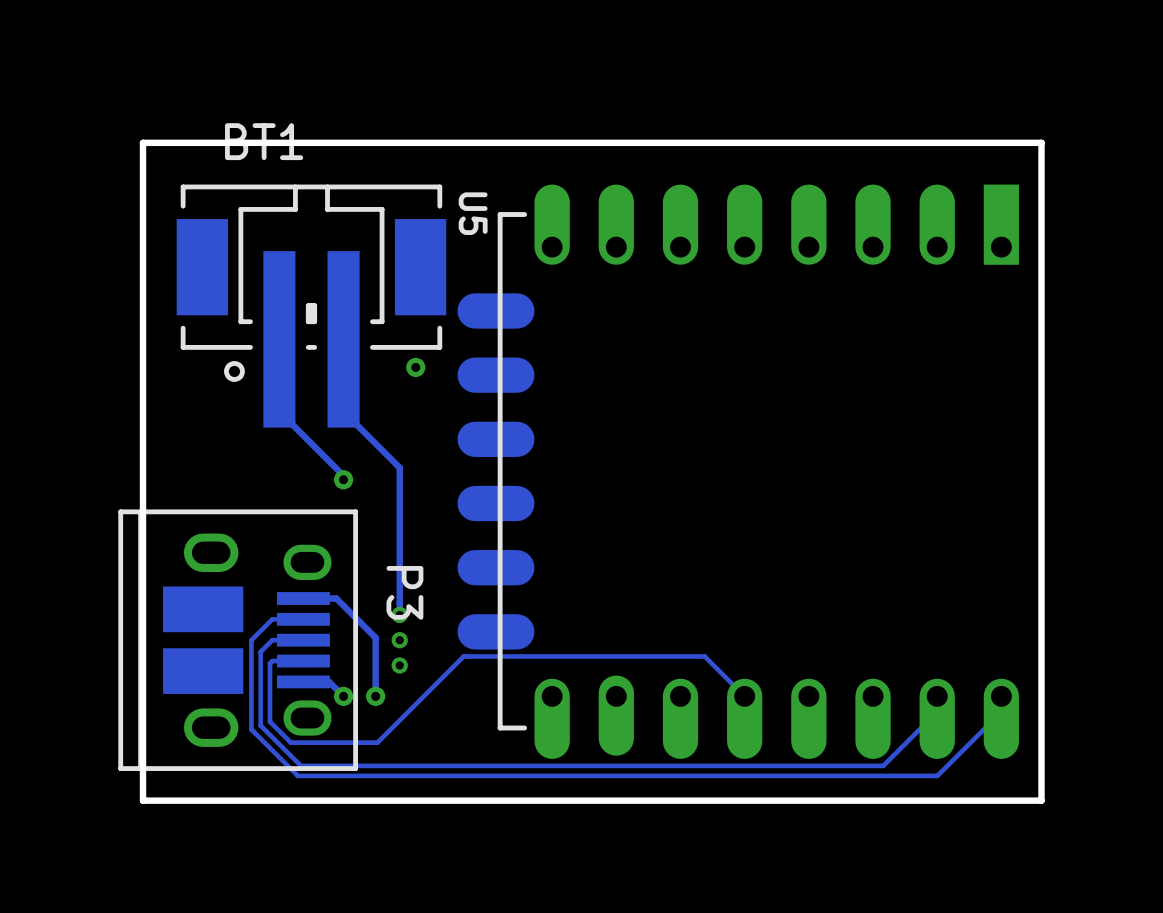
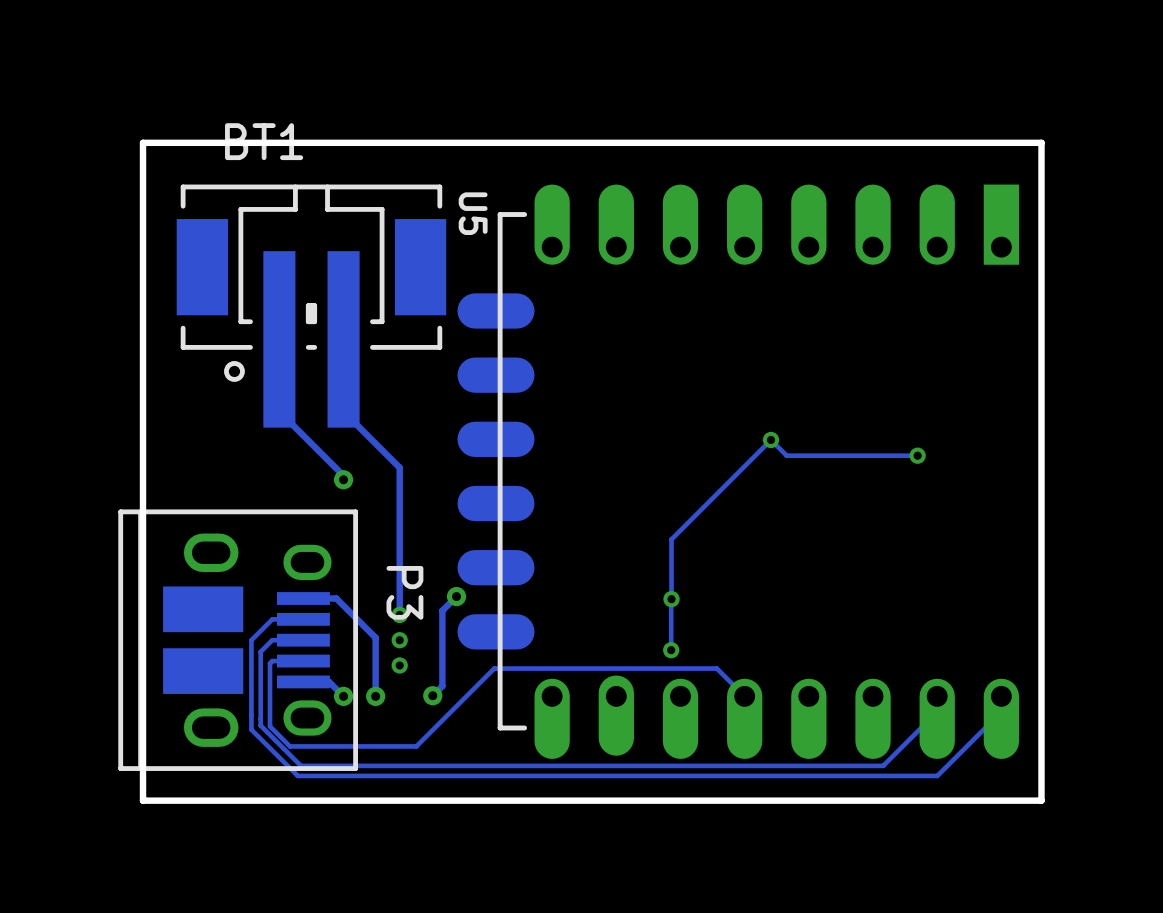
via: (415, 367) -> none
via: none -> (770, 439)
track: none -> (917, 455) (786, 455) (770, 439) (671, 539) (671, 599)
via: none -> (917, 455)
track: none -> (456, 596) (442, 610) (442, 686) (432, 695)
via: none -> (456, 596)
track: none -> (671, 599) (671, 650)
via: none -> (671, 599)
via: none -> (671, 650)
track: (716, 668) (704, 656) (463, 656) (377, 742) (290, 742) (270, 721) -> (716, 668) (494, 668) (416, 746) (289, 746) (270, 726) (270, 721)
via: none -> (432, 695)

